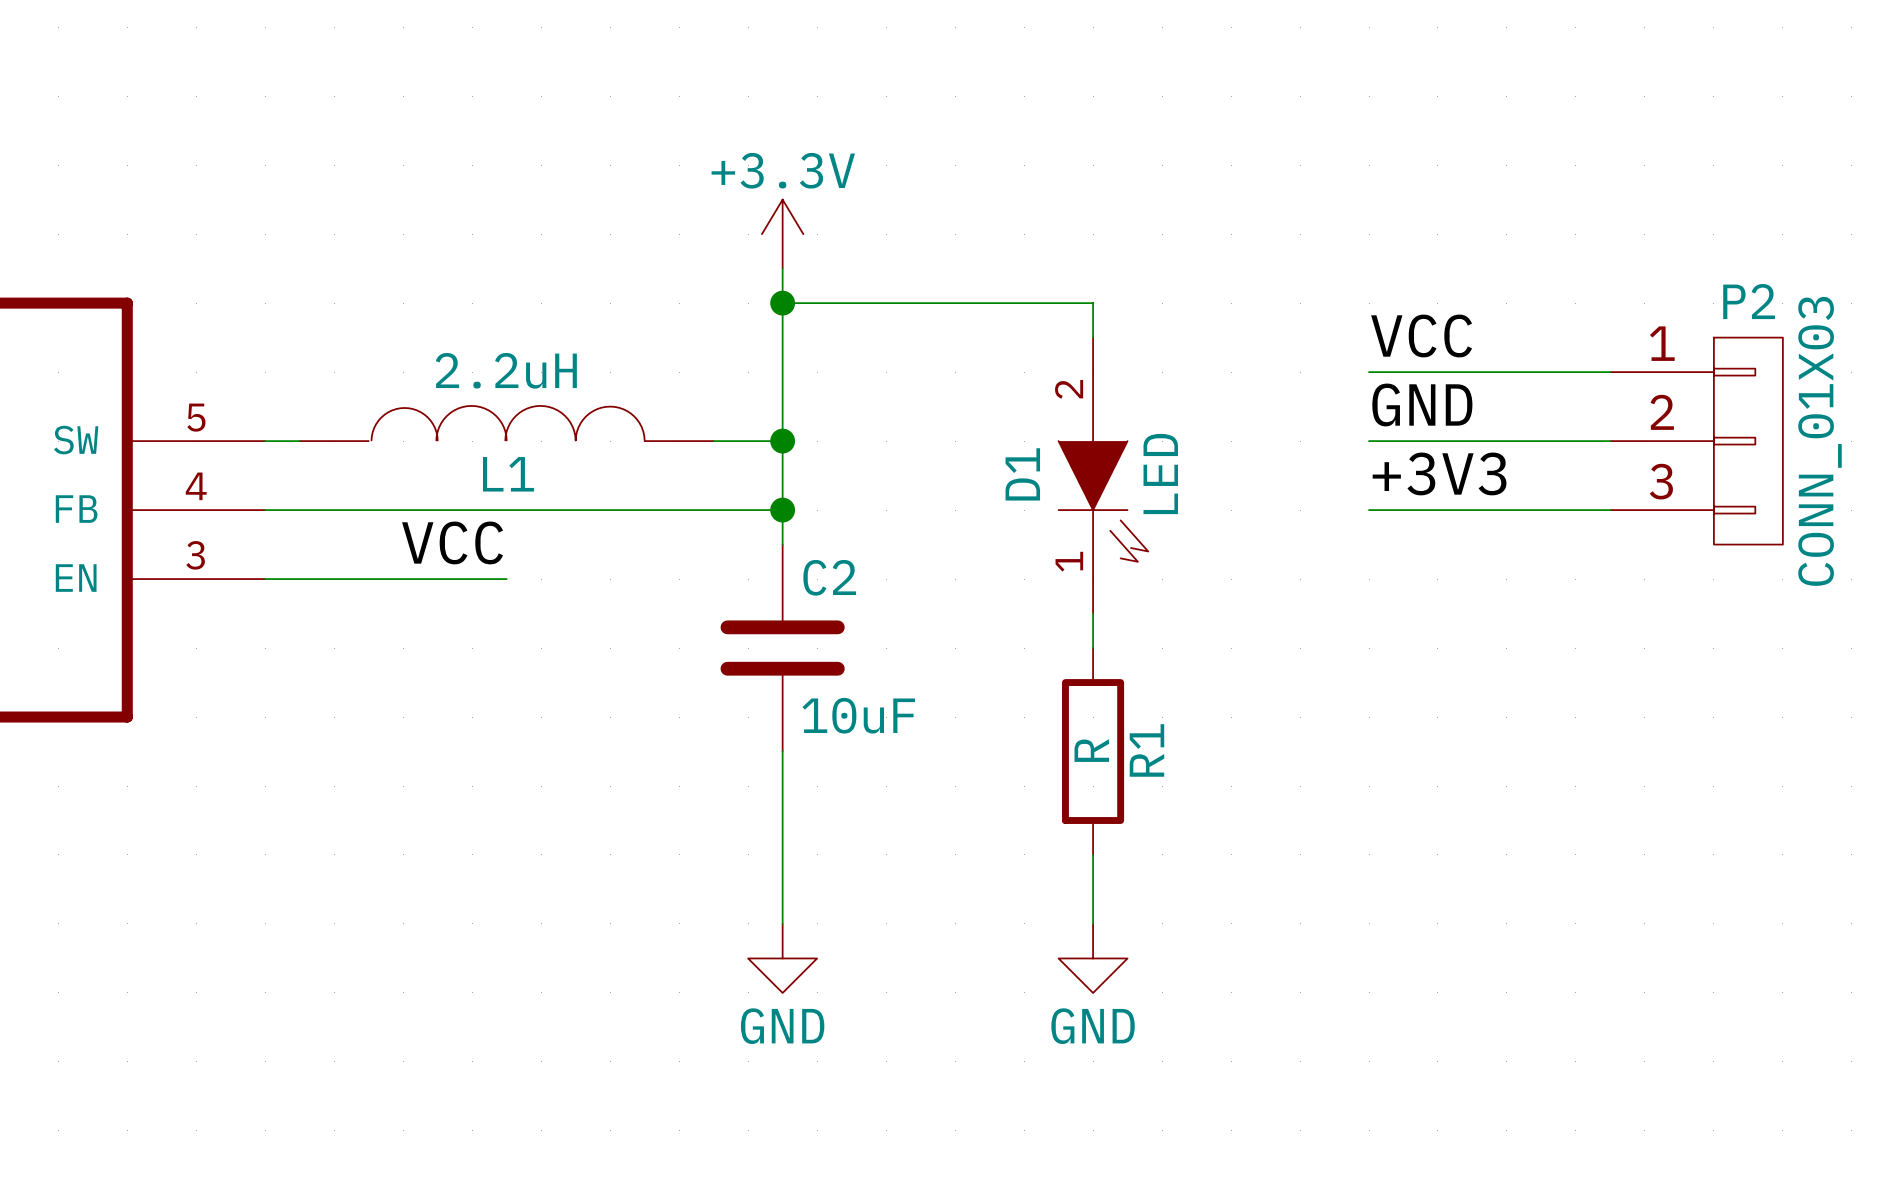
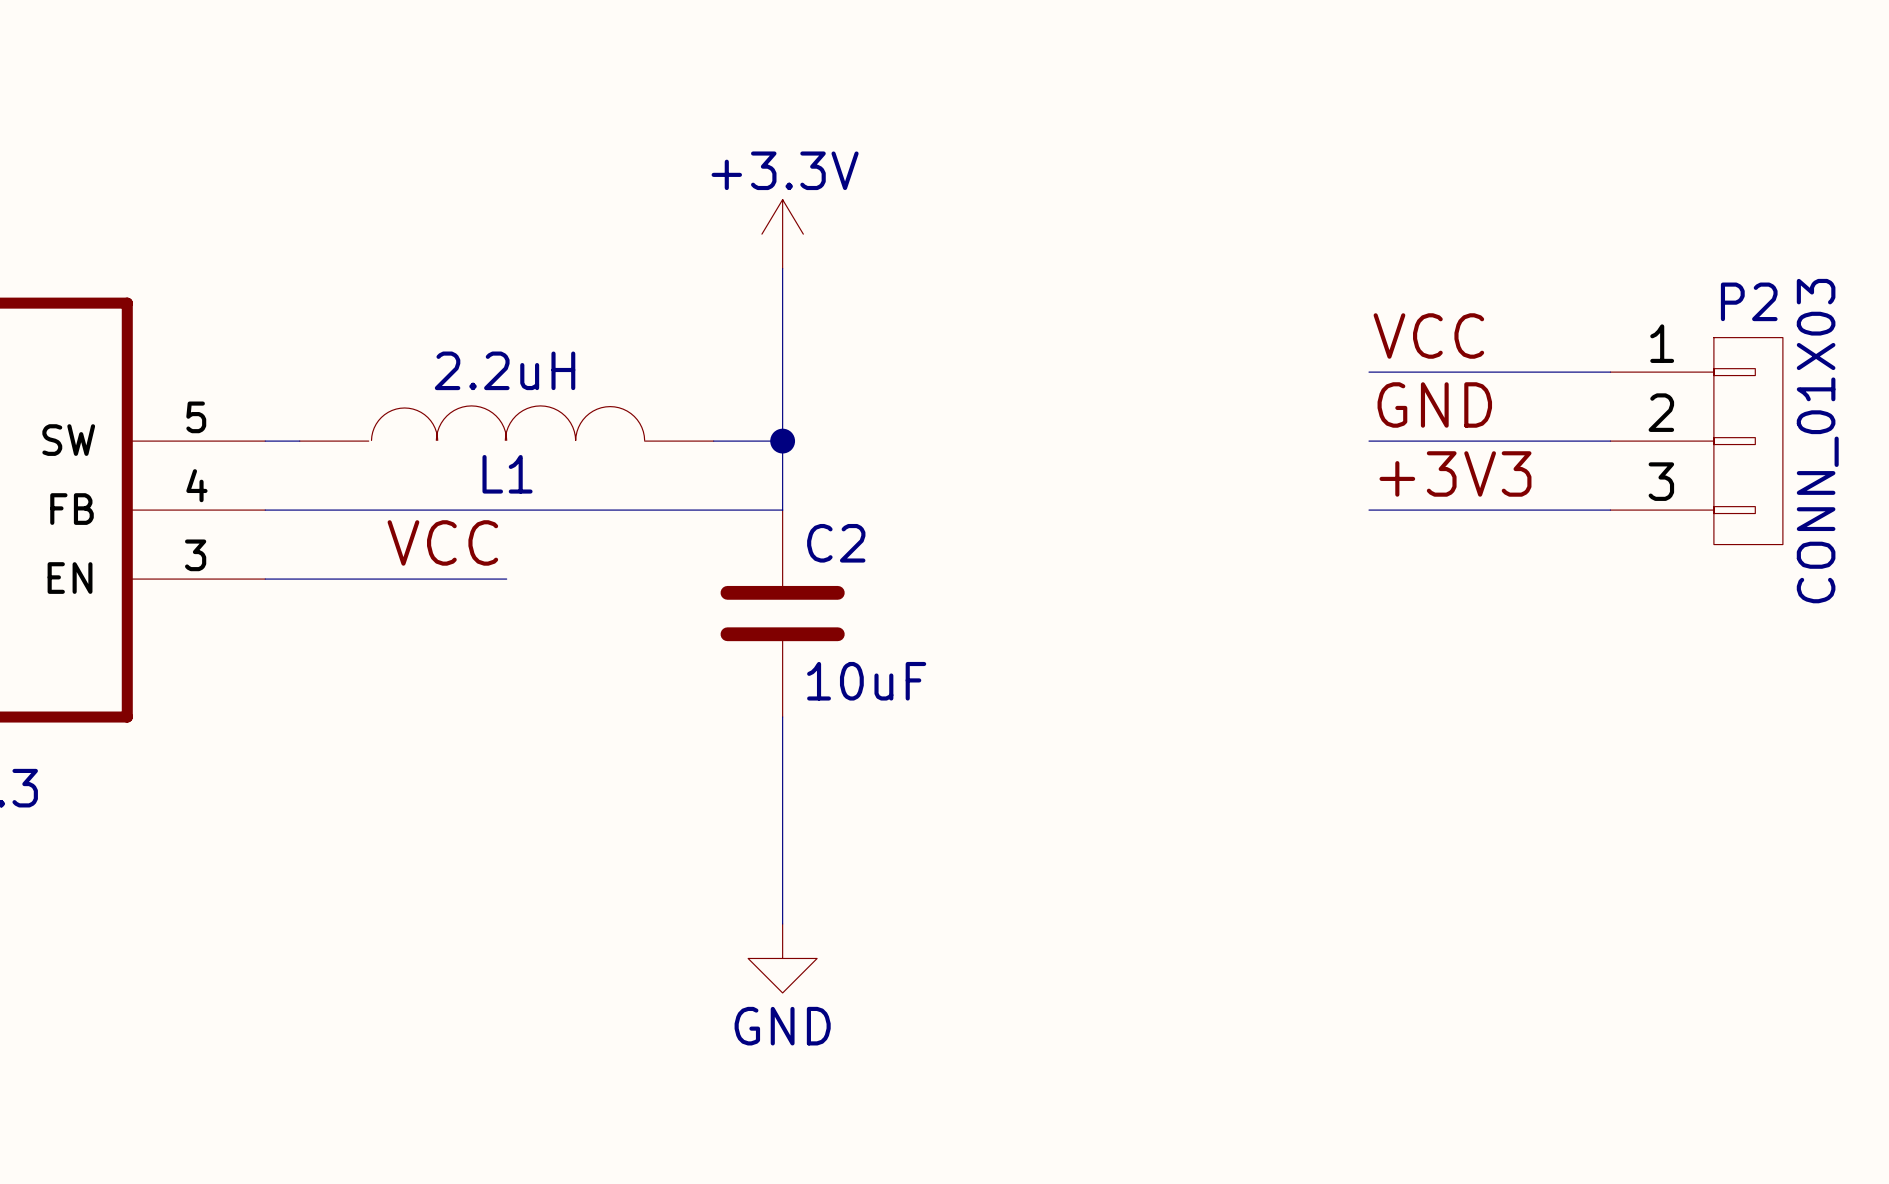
wire: (782, 303) (1093, 303) (1093, 337) -> none
junction: (782, 303) -> none
D1: LED (1103, 475) -> none
junction: (782, 510) -> none
wire: (1093, 613) (1093, 648) -> none
C2 position: (782, 648) -> (782, 613)
R1: R (1093, 751) -> none
wire: (1093, 854) (1093, 923) -> none
power symbol: GND (1093, 958) -> none

